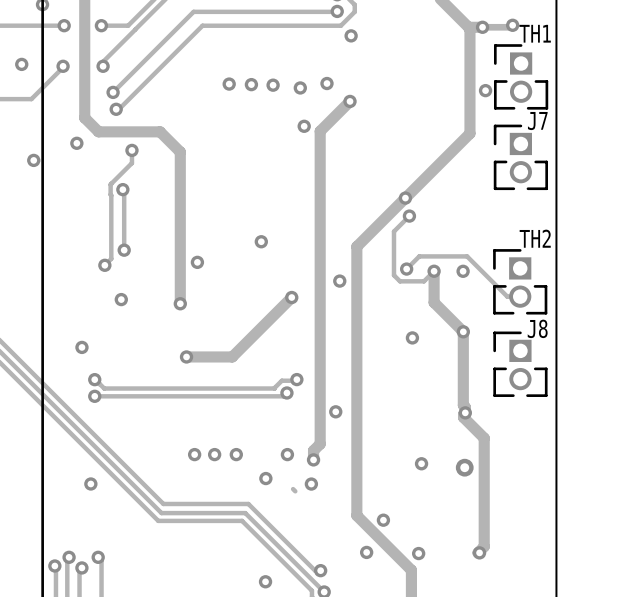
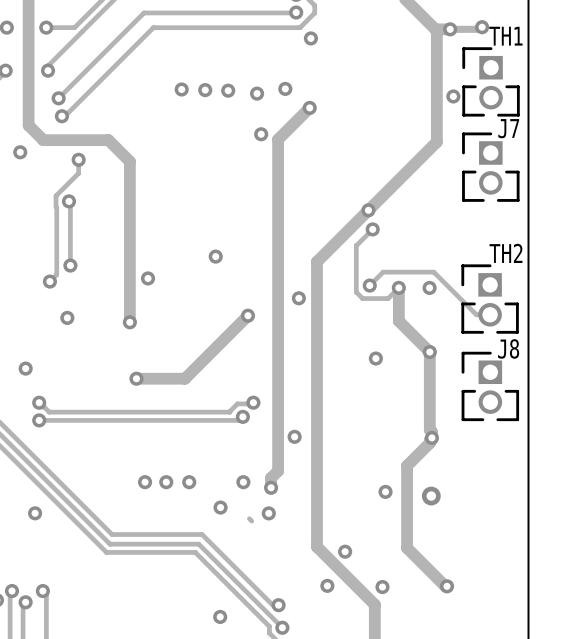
track: (463, 417) (484, 438) (484, 546) (477, 552) -> (430, 442) (407, 465) (407, 548) (445, 586)

